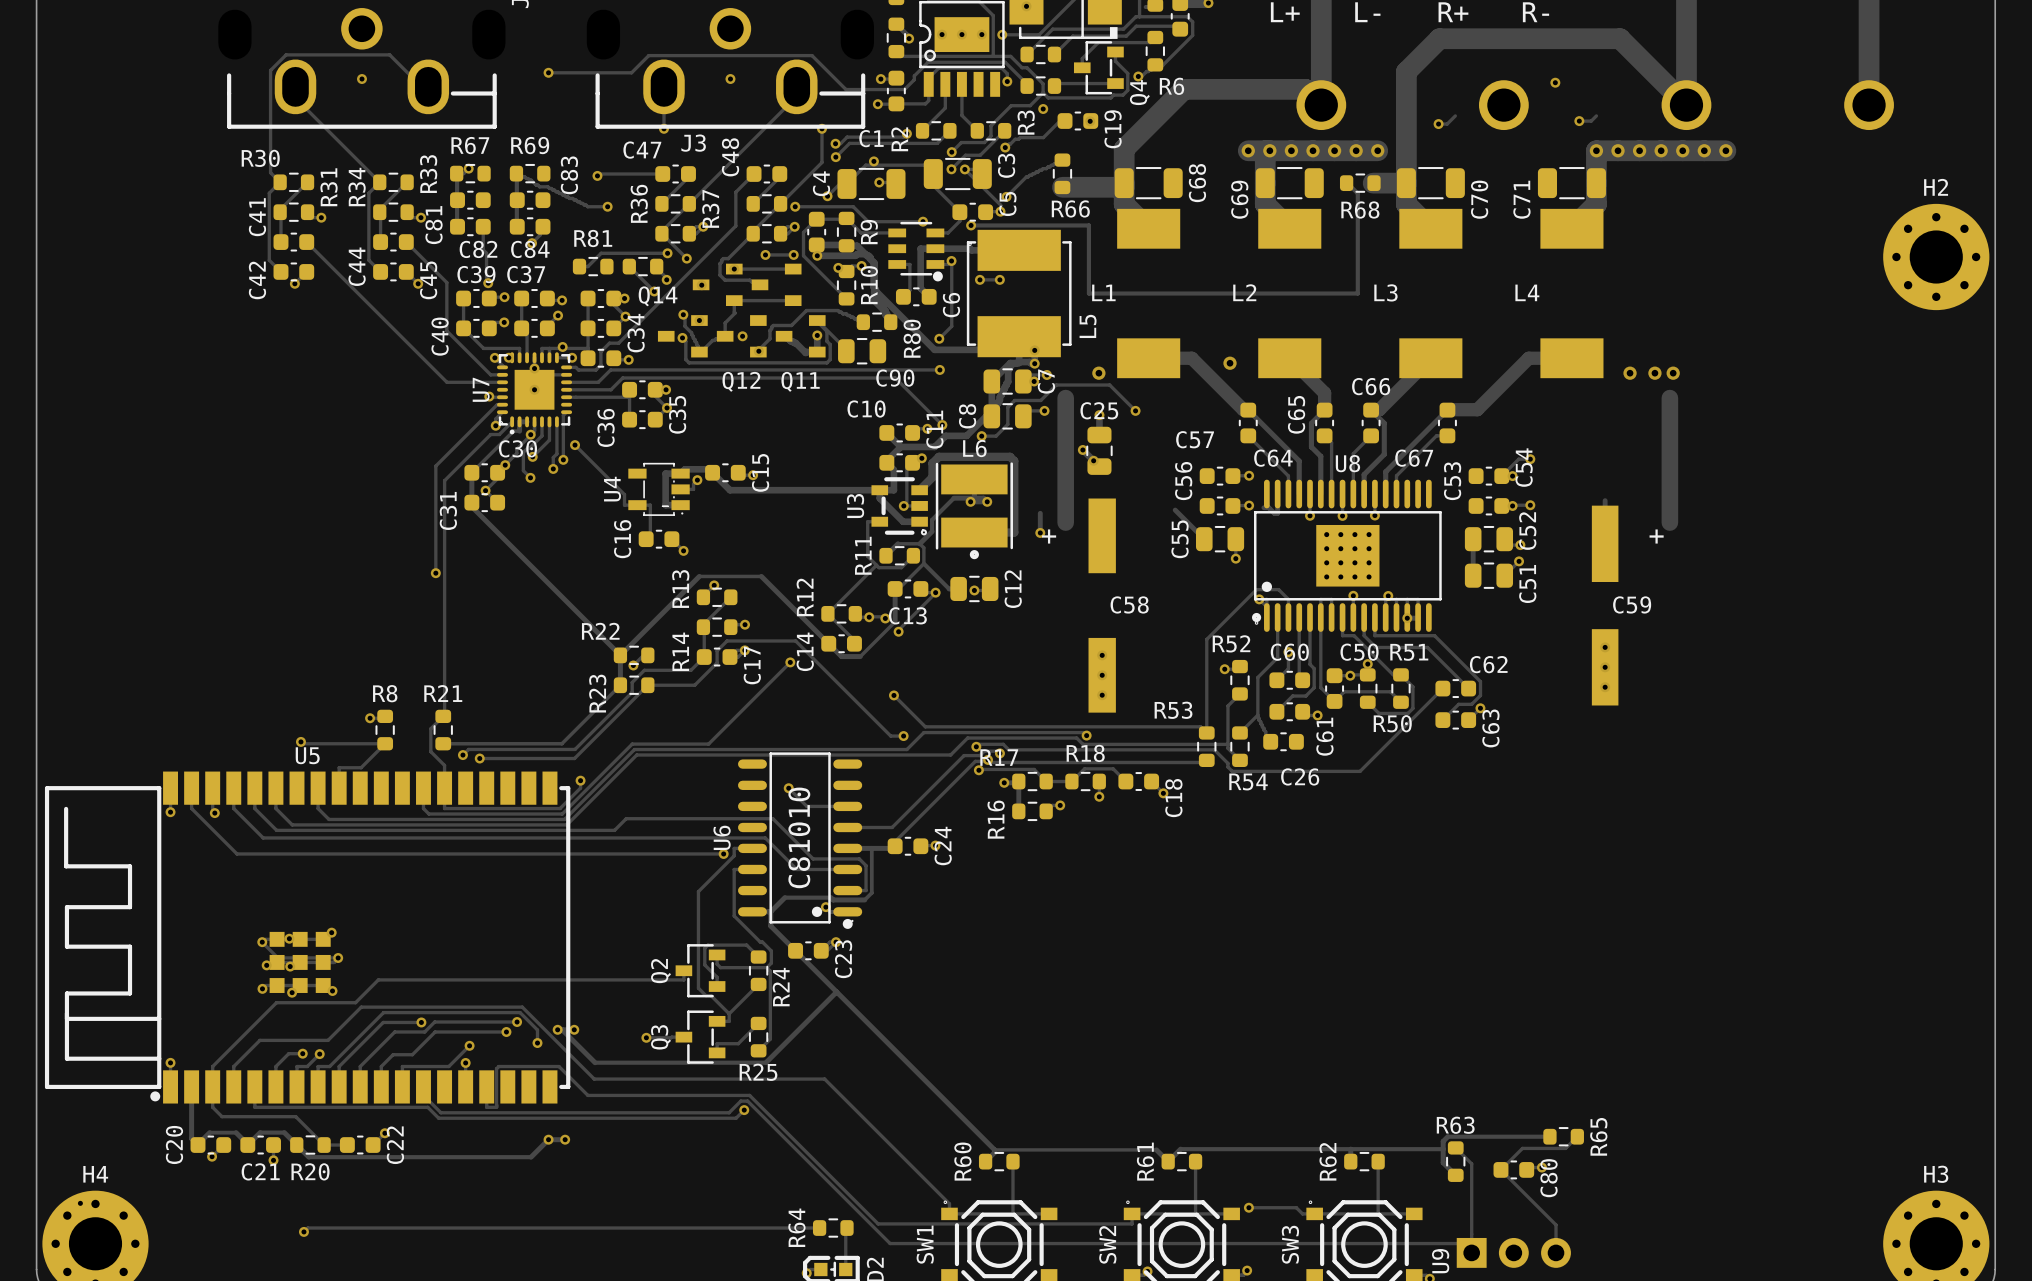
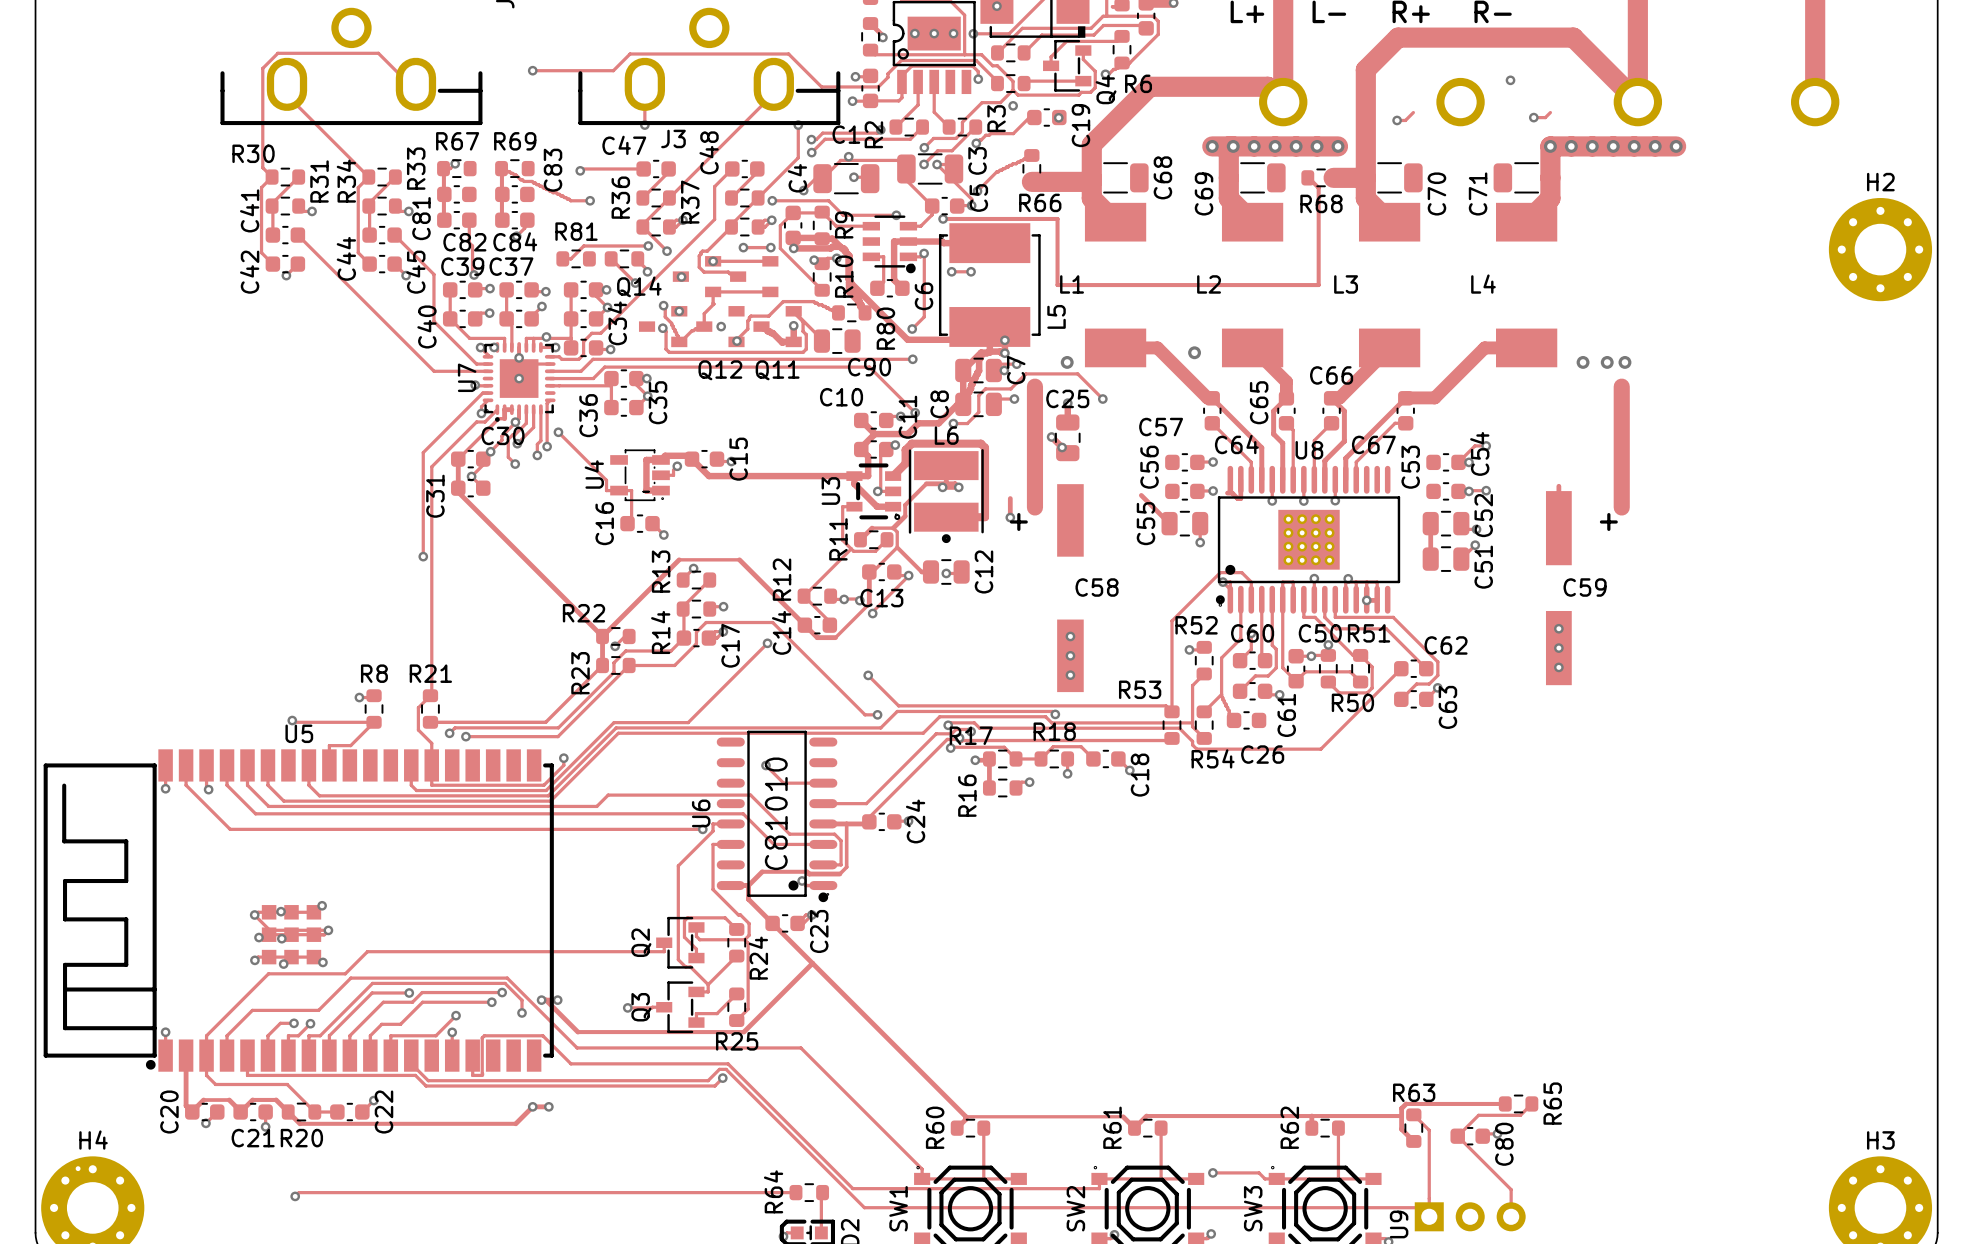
via: (361, 79) -> none
via: (730, 79) -> none

